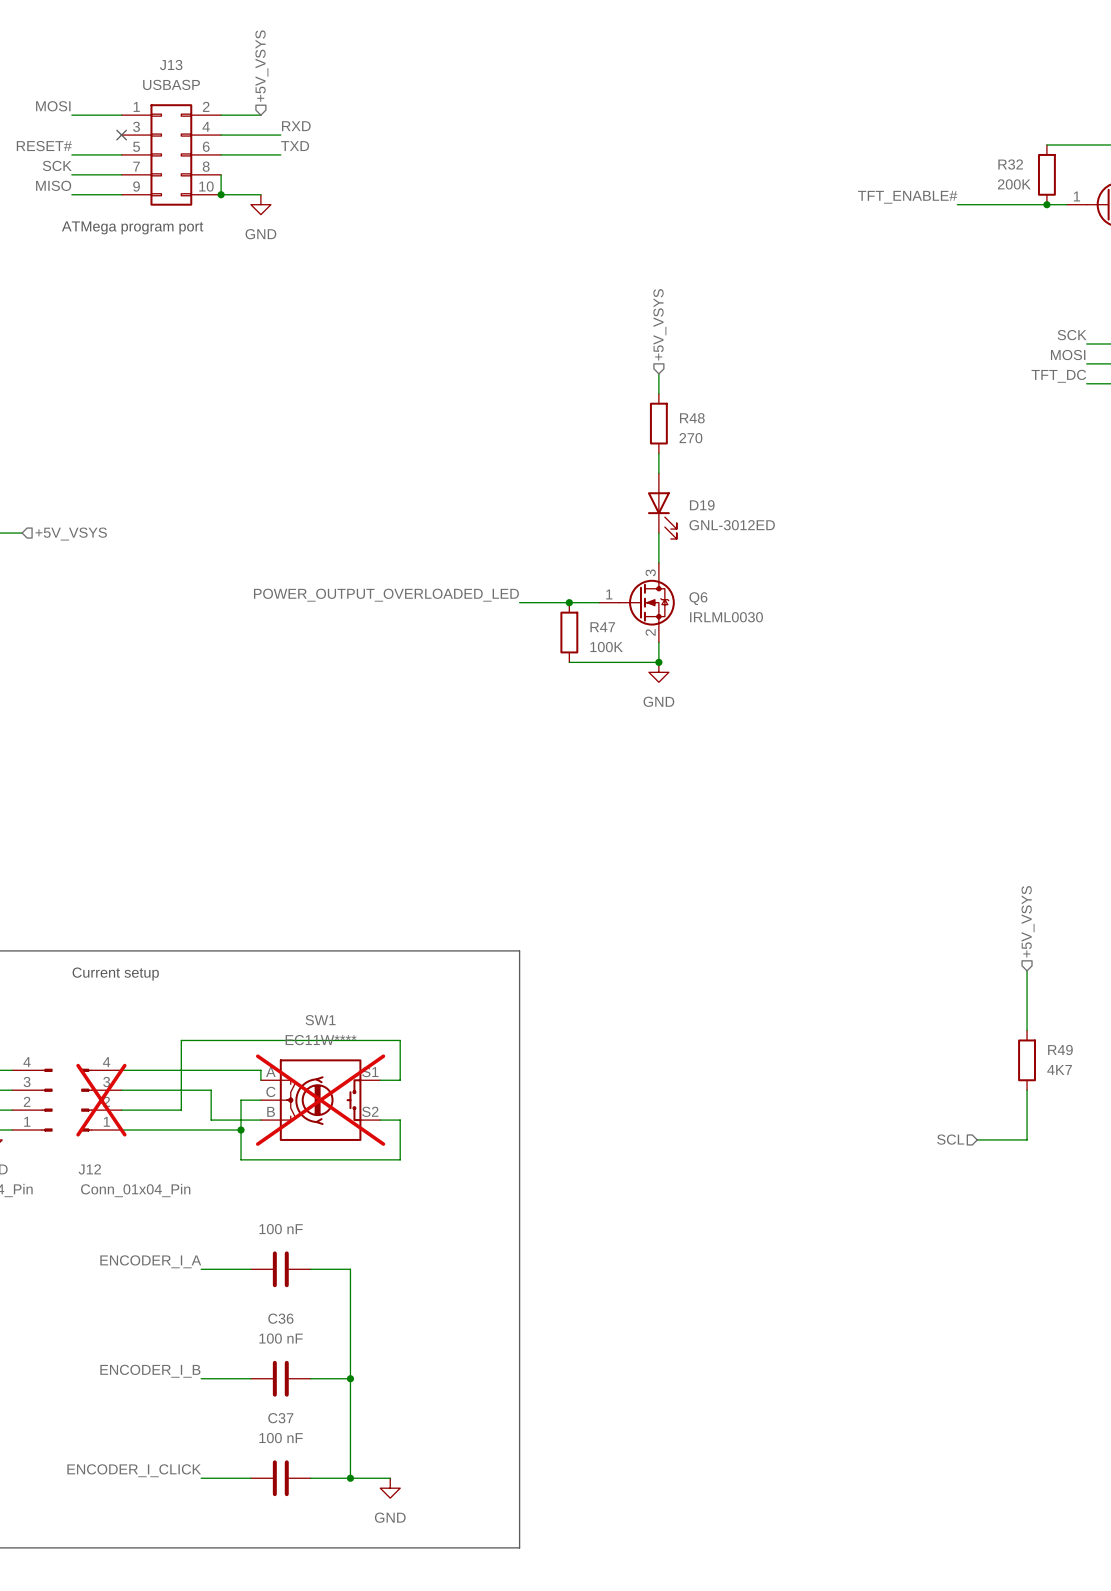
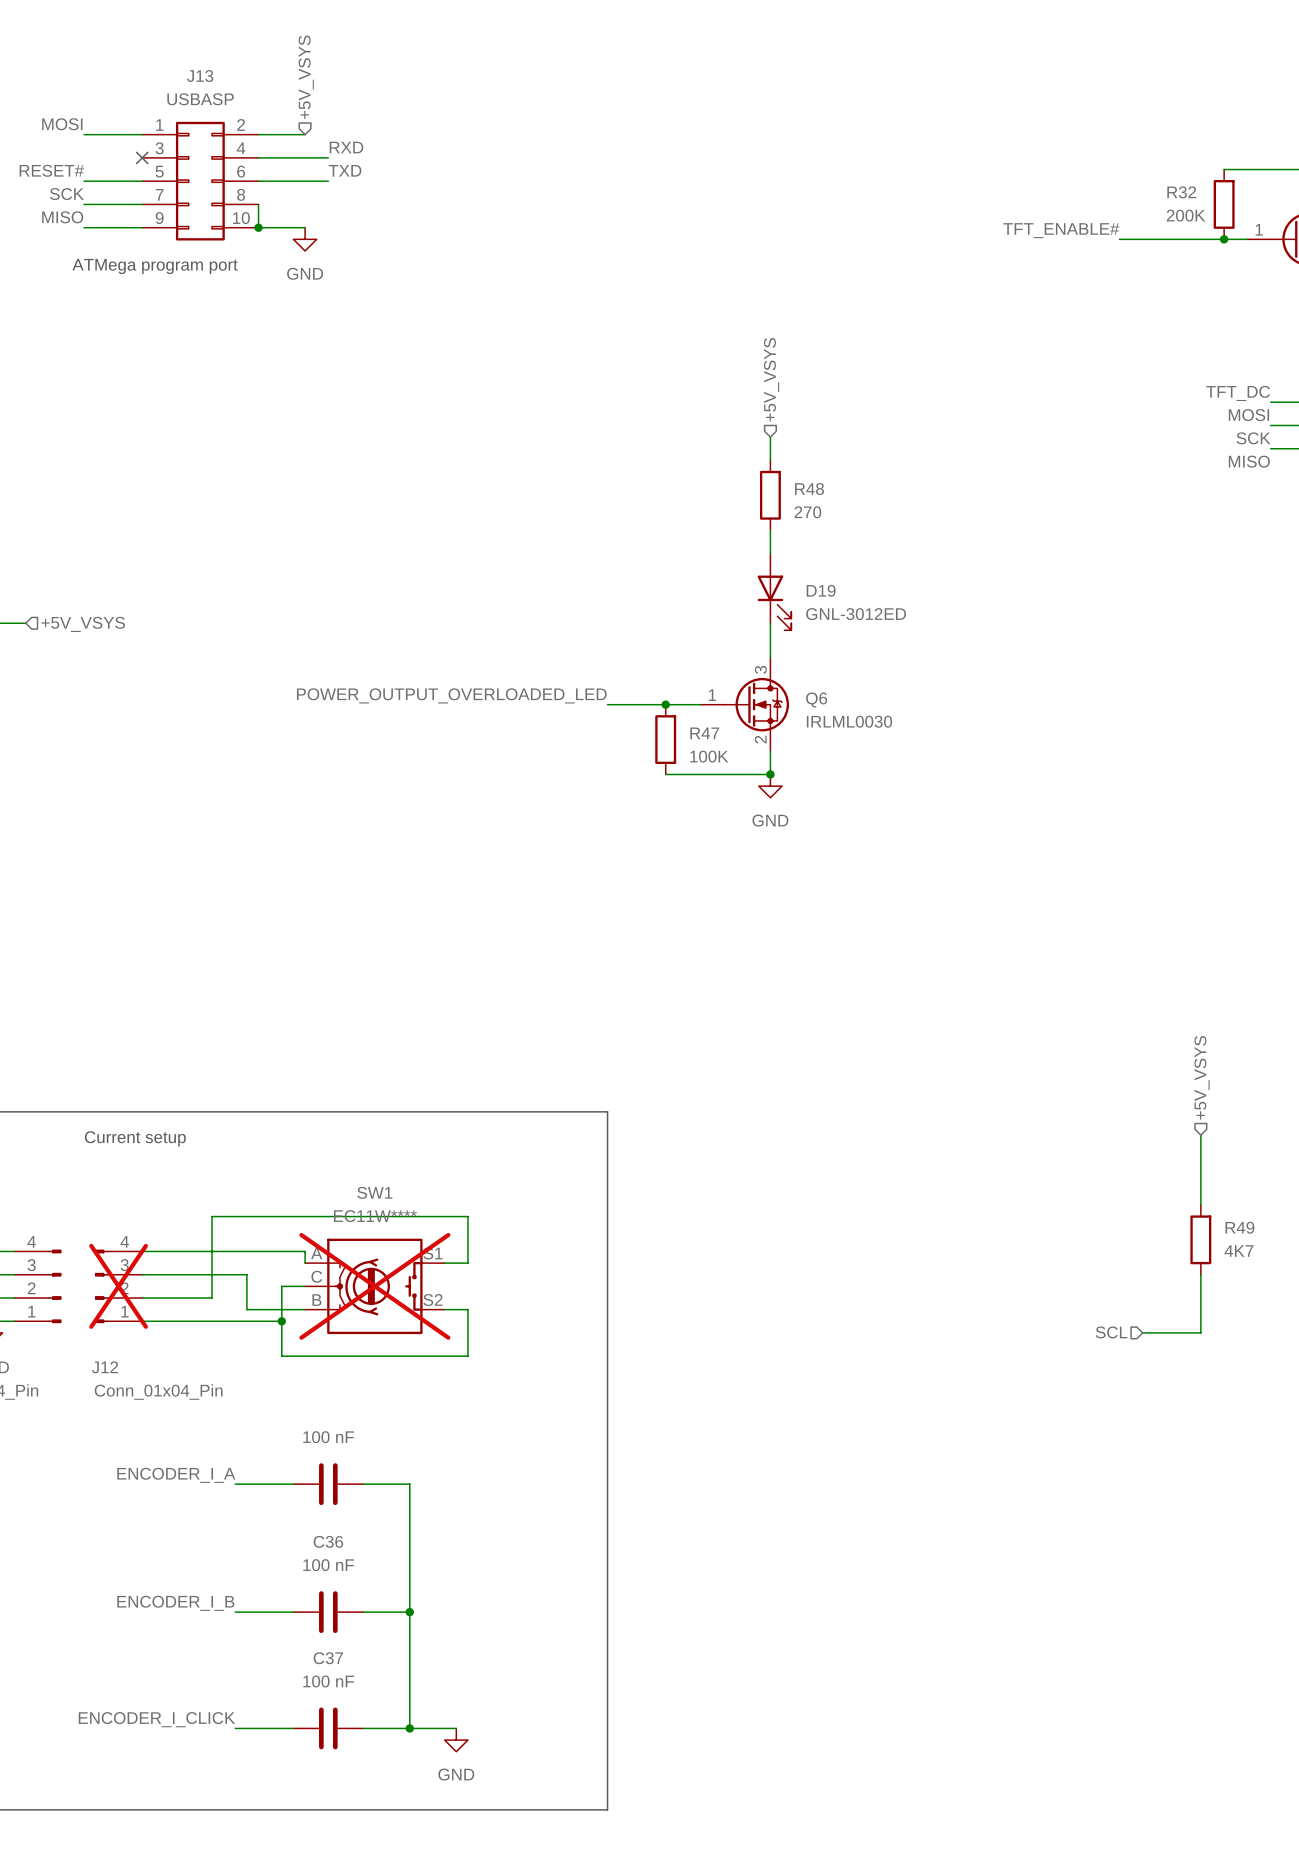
label: SCK (1072, 335) -> TFT_DC (1238, 393)
label: TFT_DC (1058, 376) -> SCK (1253, 438)
label: none -> MISO (1249, 461)

